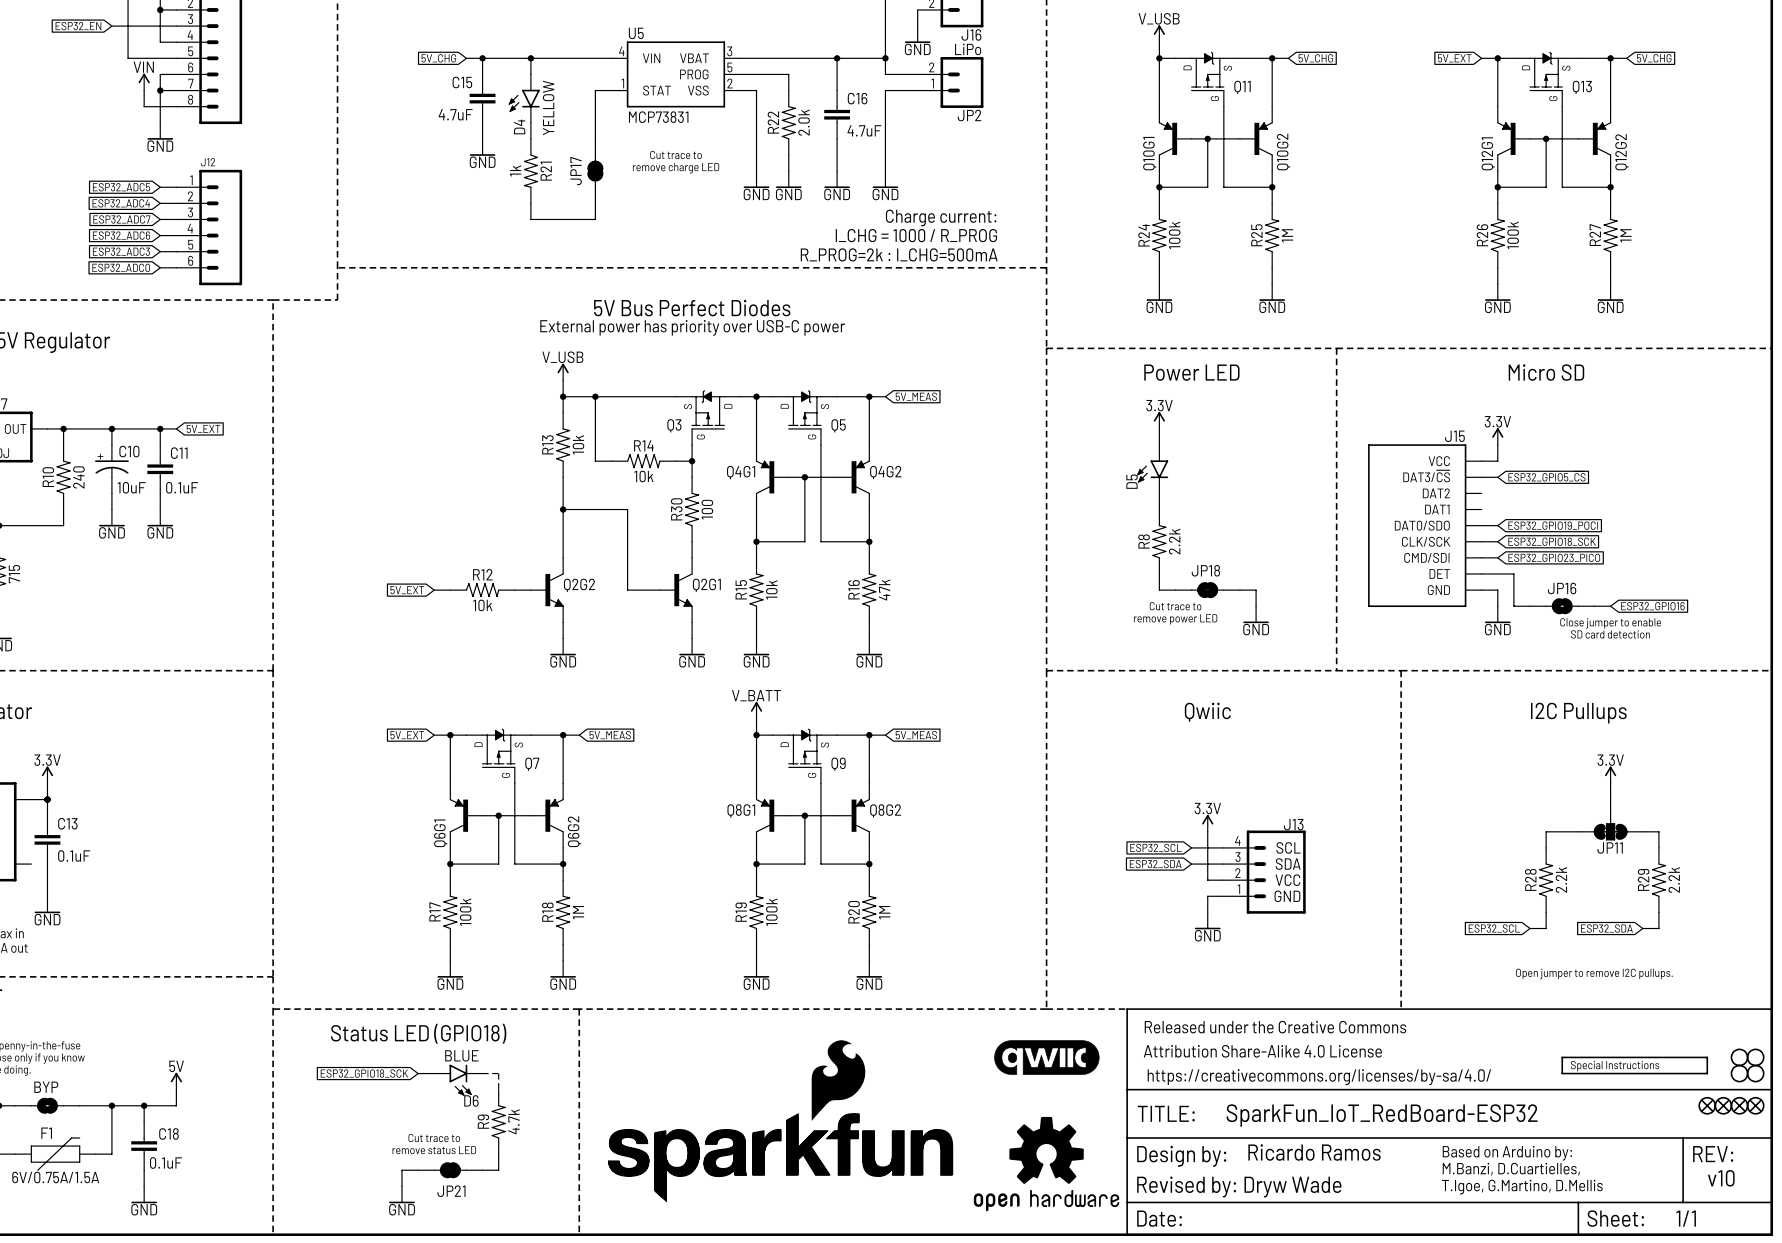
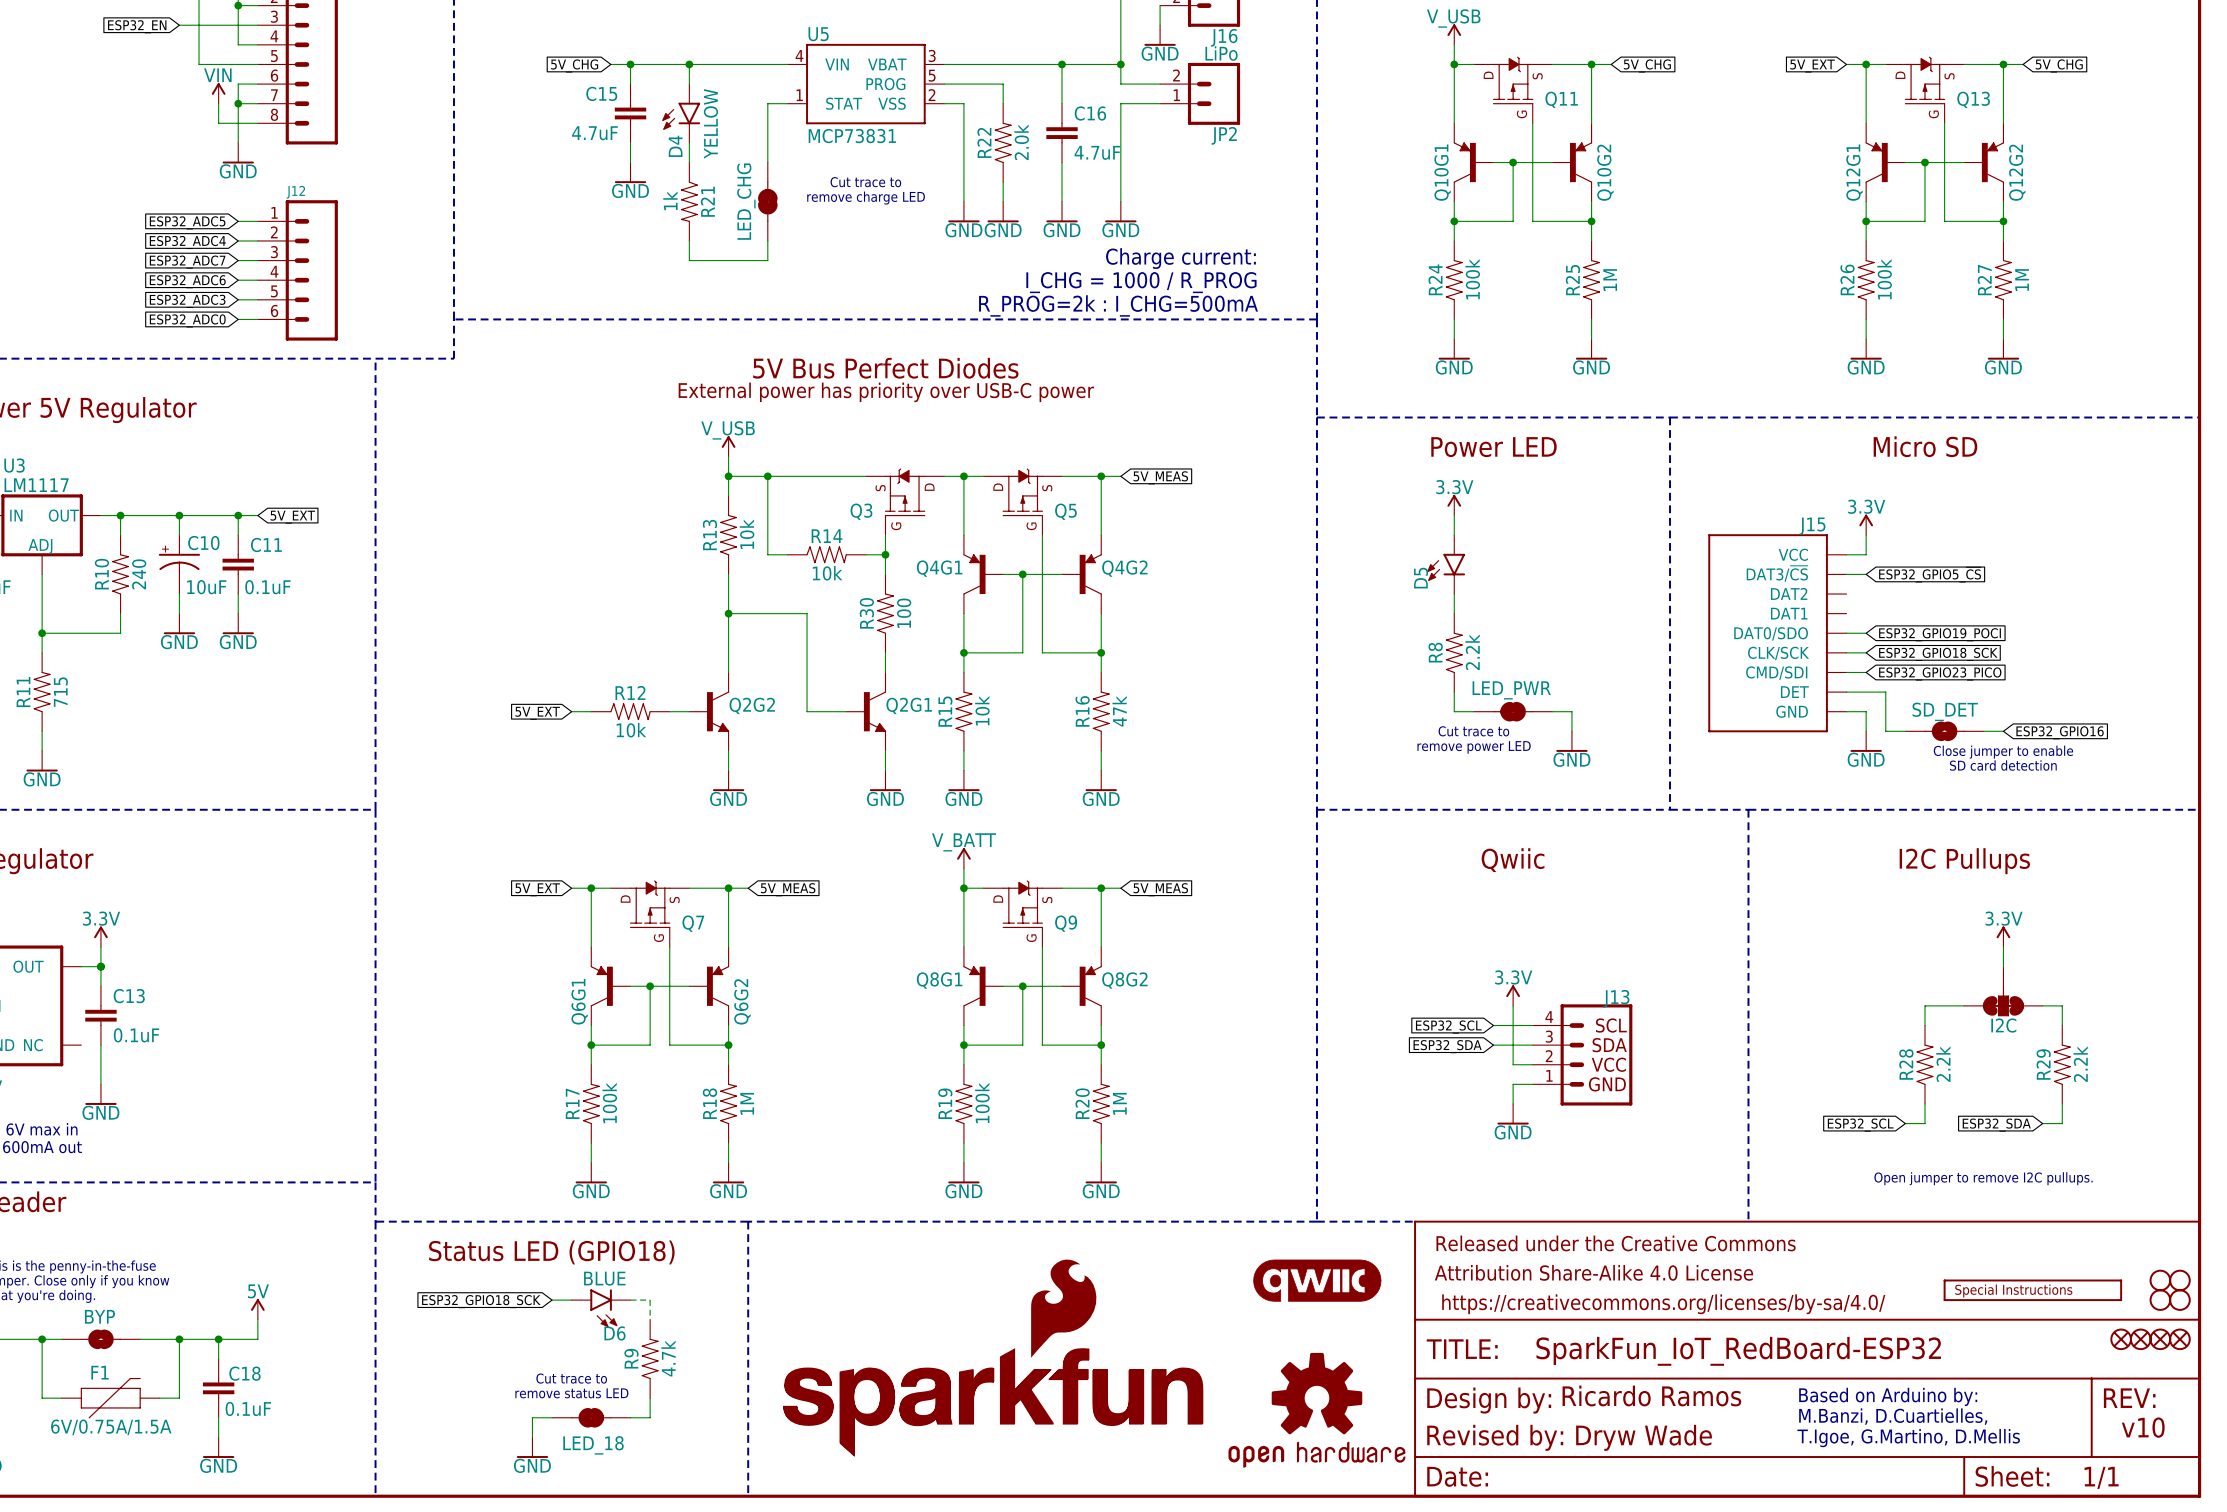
JP17 name: JP17 (576, 171) -> LED_CHG (746, 201)
JP18 name: JP18 (1205, 570) -> LED_PWR (1511, 690)
JP16 name: JP16 (1562, 588) -> SD_DET (1945, 711)
JP11 name: JP11 (1610, 848) -> I2C (2003, 1025)
JP21 name: JP21 (451, 1191) -> LED_18 (593, 1445)

